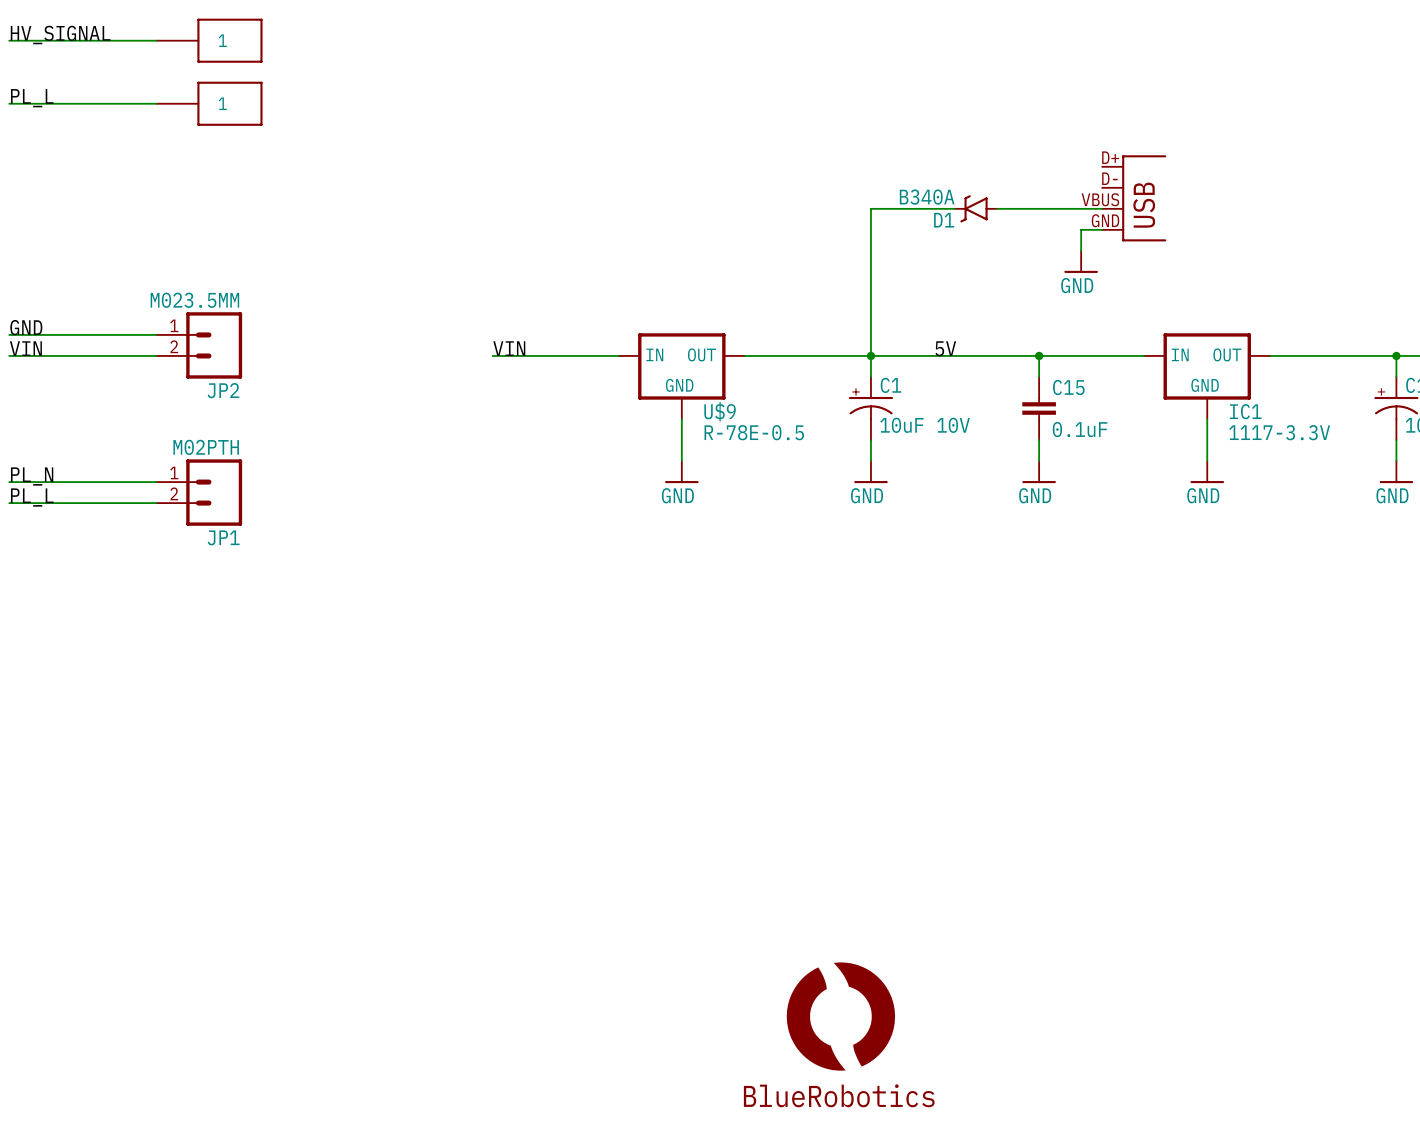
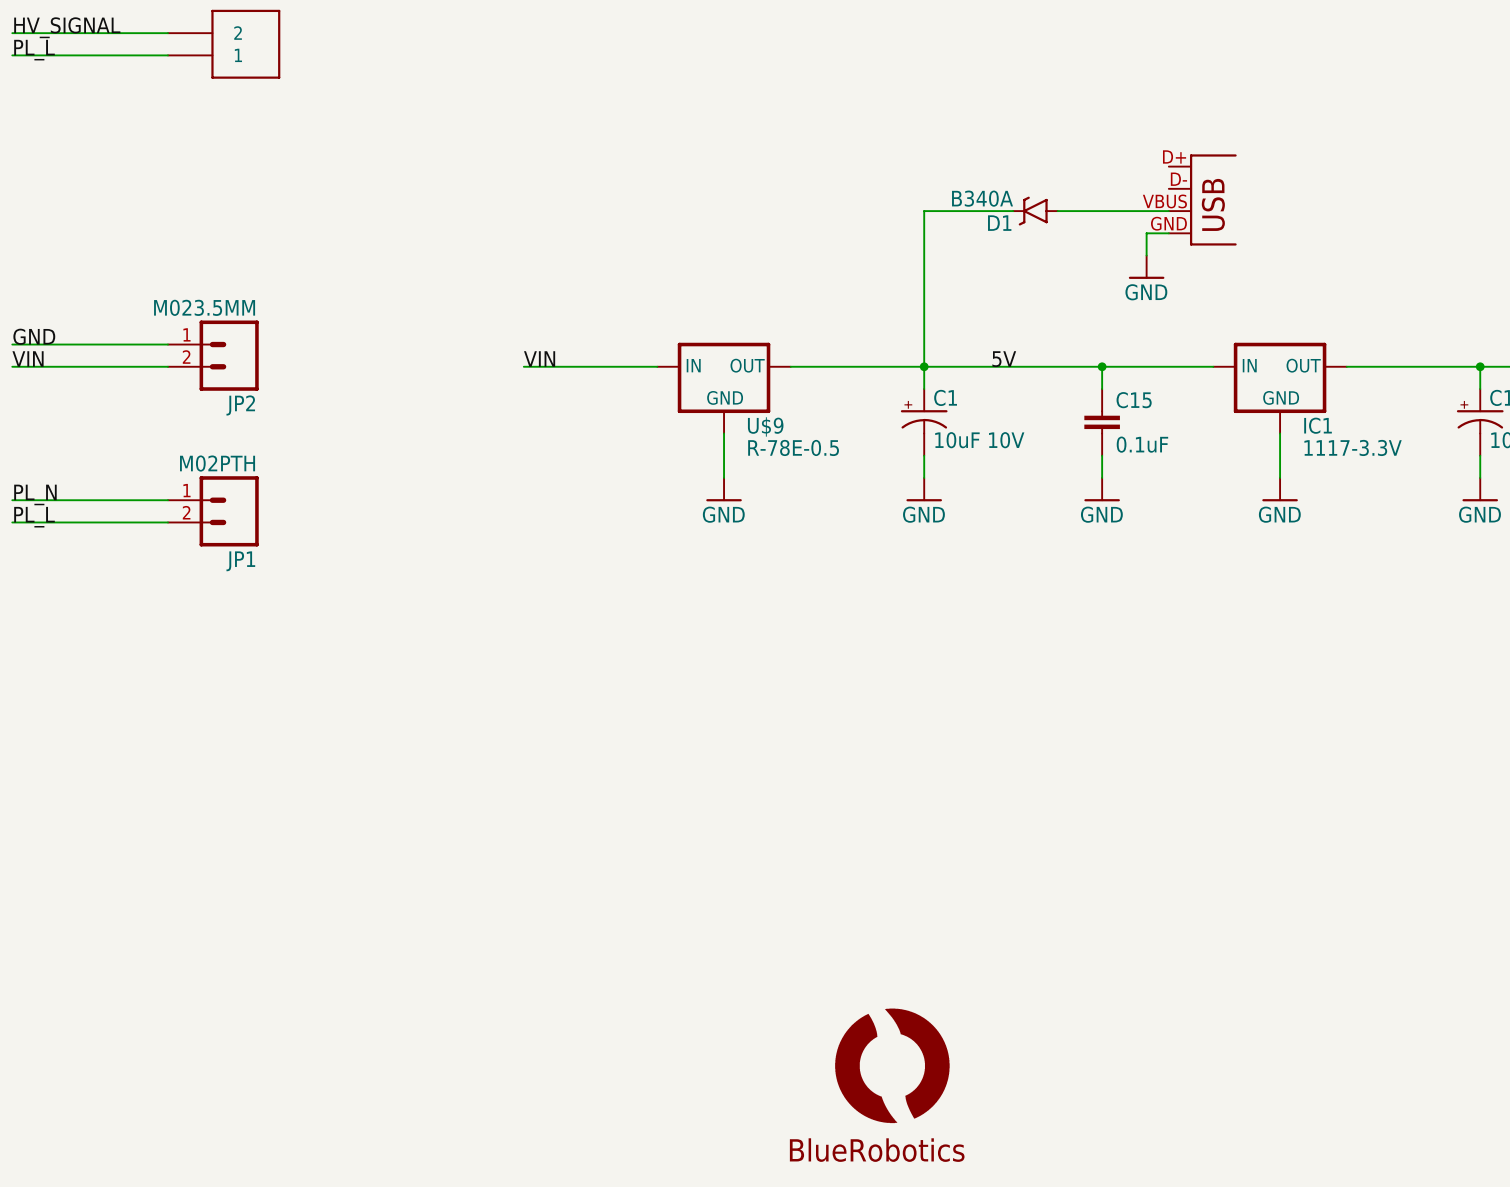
part: (209, 40) -> none
part: none -> (224, 44)
label position: PL_L (32, 98) -> PL_L (34, 50)
wire: (9, 103) (156, 103) -> (12, 55) (167, 55)
part: (209, 103) -> none

